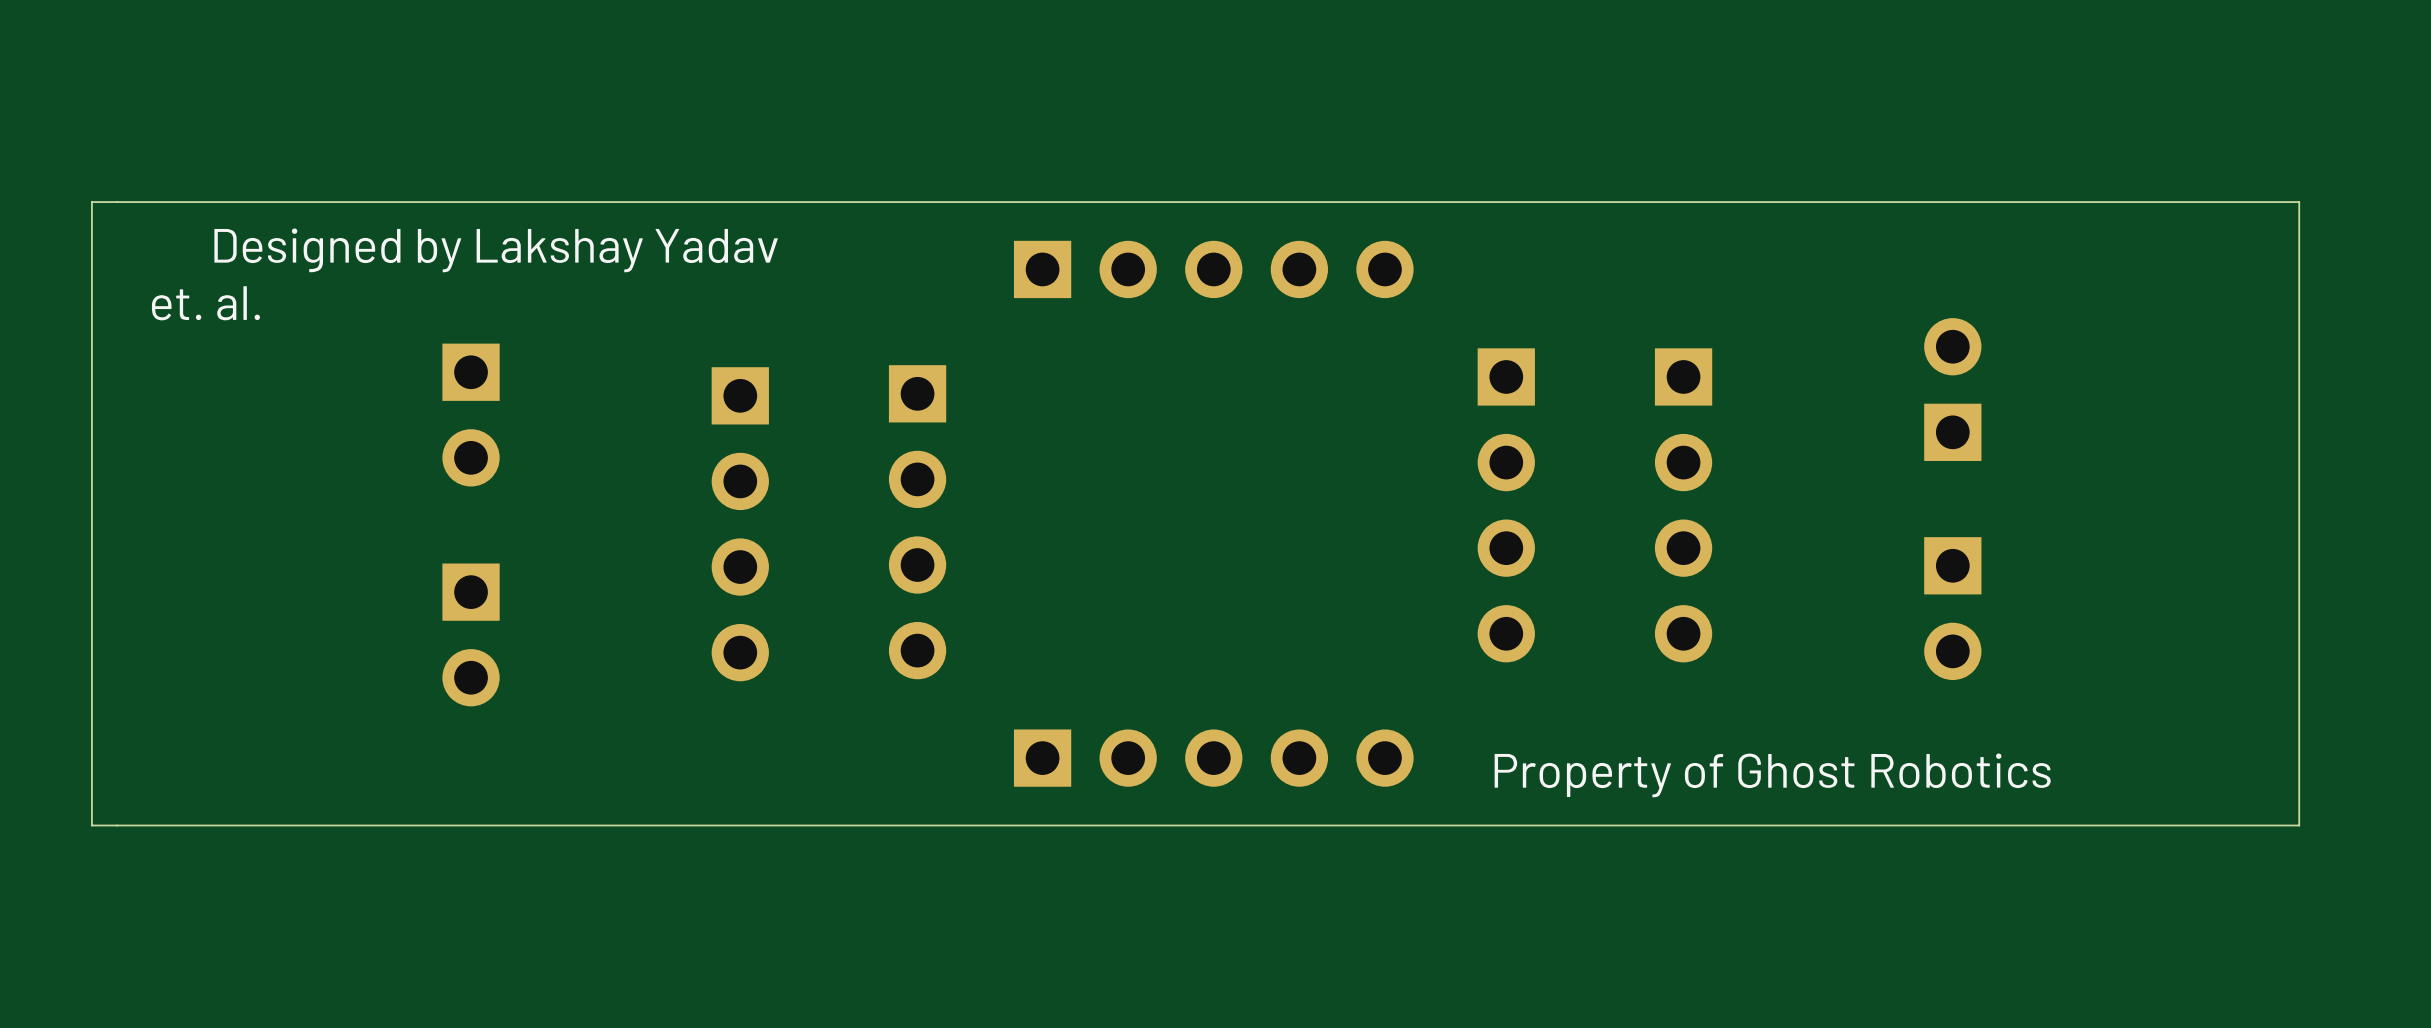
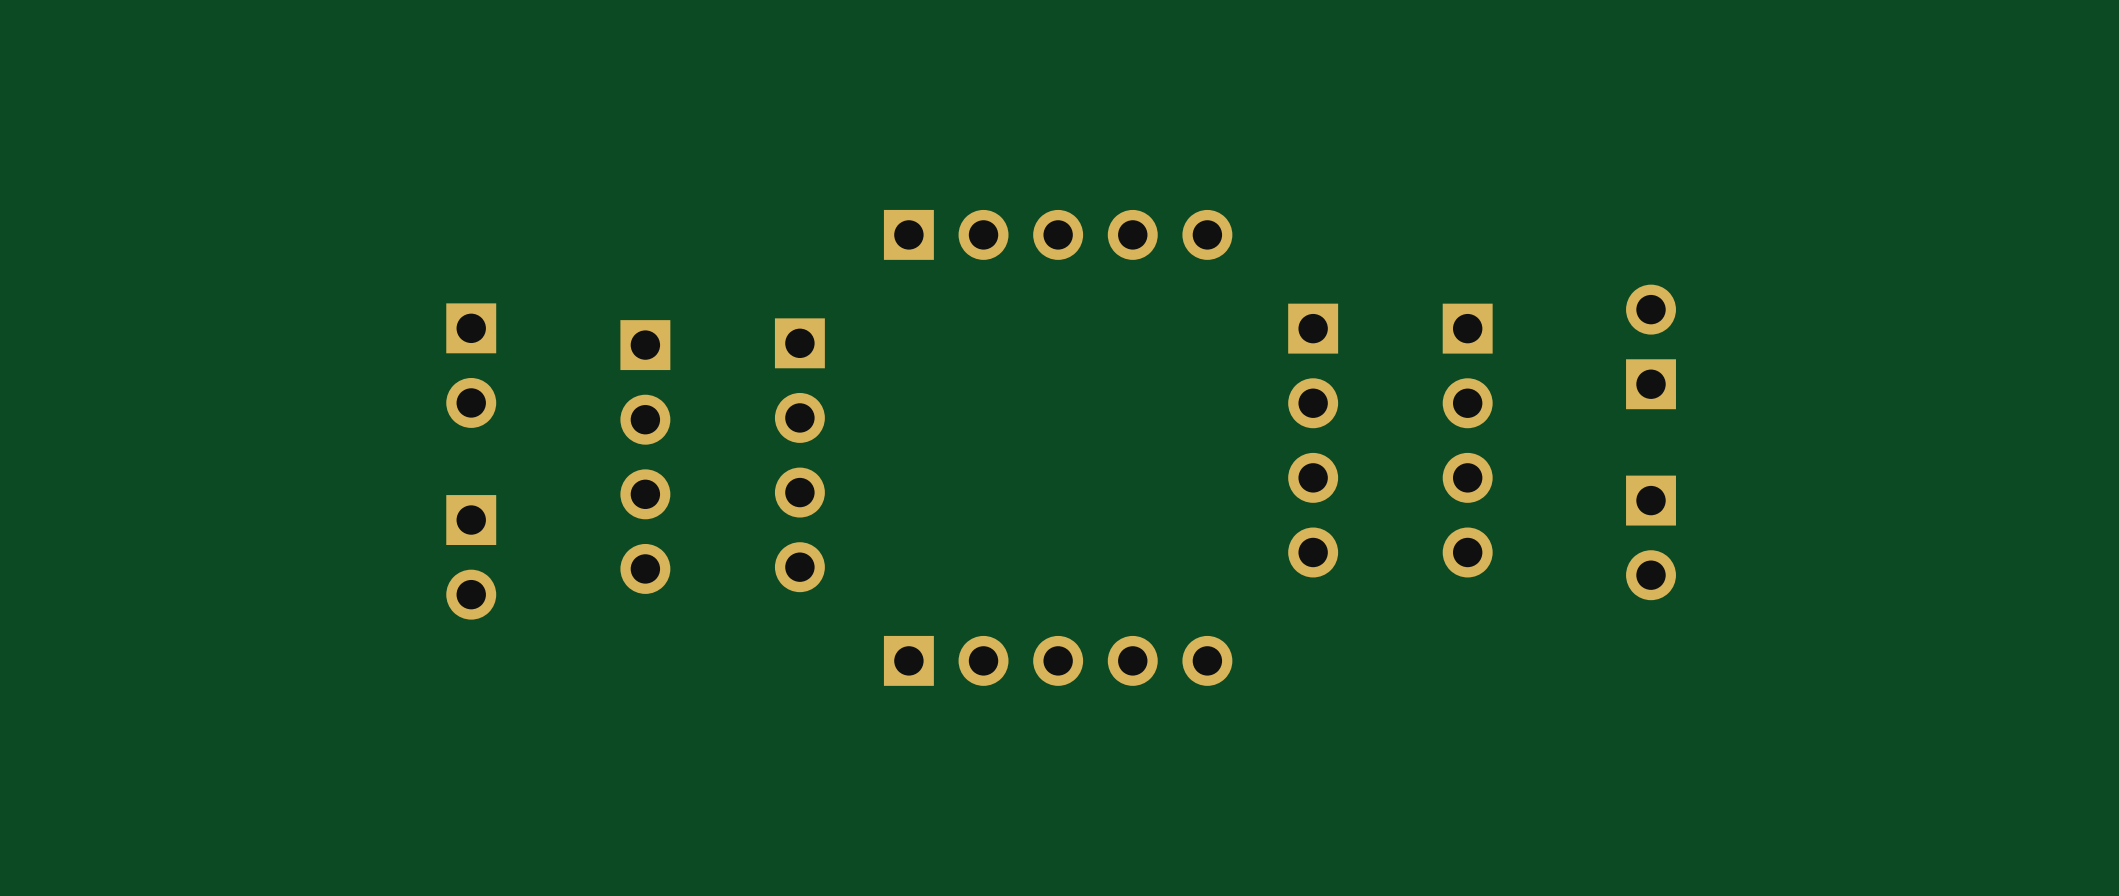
board edge: (2299, 202) (91, 202) (91, 825) (2299, 825) (2299, 202) -> none
text: Designed by Lakshay Yadav (496, 250) -> none
text: et. al. (205, 303) -> none
part position: (1952, 389) -> (1651, 346)
part position: (471, 415) -> (471, 365)
part position: (1952, 608) -> (1651, 537)
part position: (471, 634) -> (471, 557)
text: Property of Ghost Robotics (1772, 775) -> none

